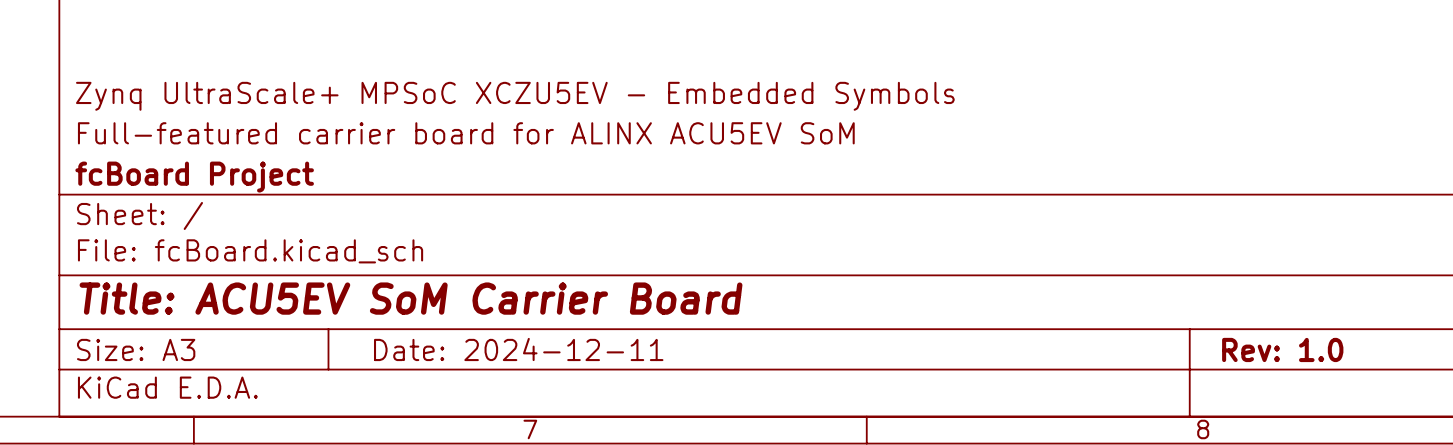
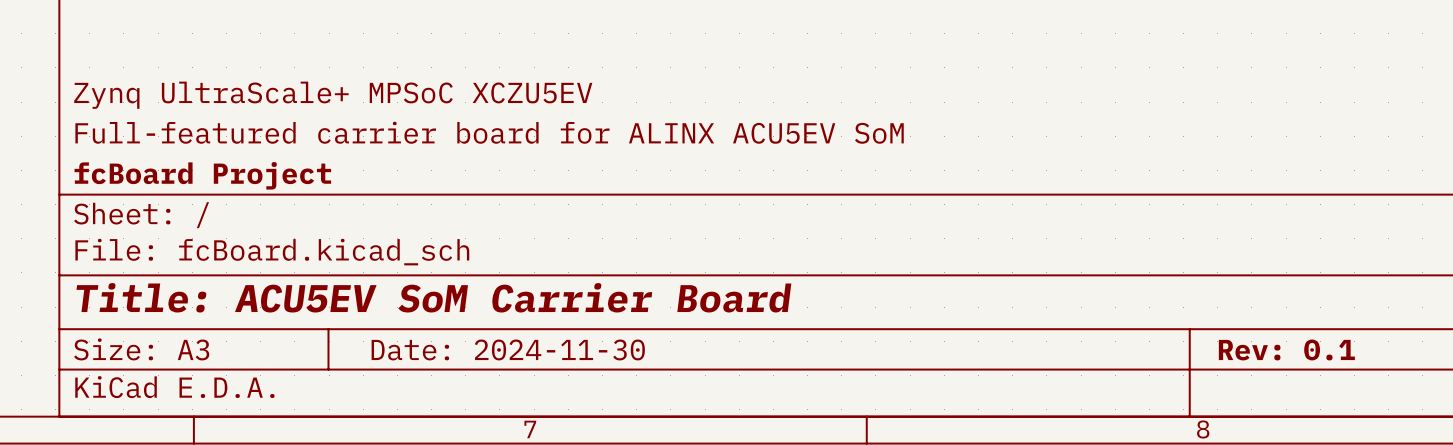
title block: Zynq UltraScale+ MPSoC XCZU5EV - Embedded Symbols (515, 96) -> Zynq UltraScale+ MPSoC XCZU5EV (333, 95)
title block: Date: 2024-12-11 (518, 349) -> Date: 2024-11-30 (508, 349)
title block: Rev: 1.0 (1282, 349) -> Rev: 0.1 (1286, 349)

